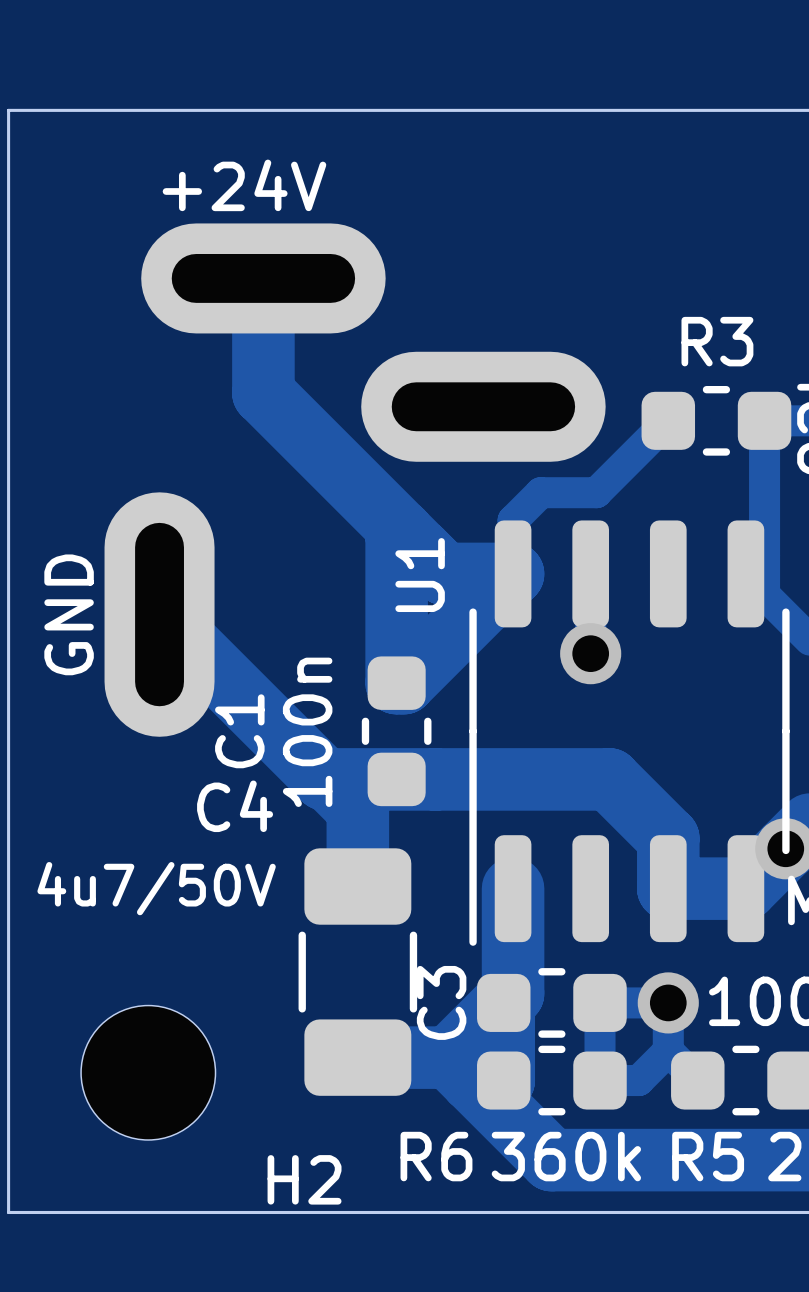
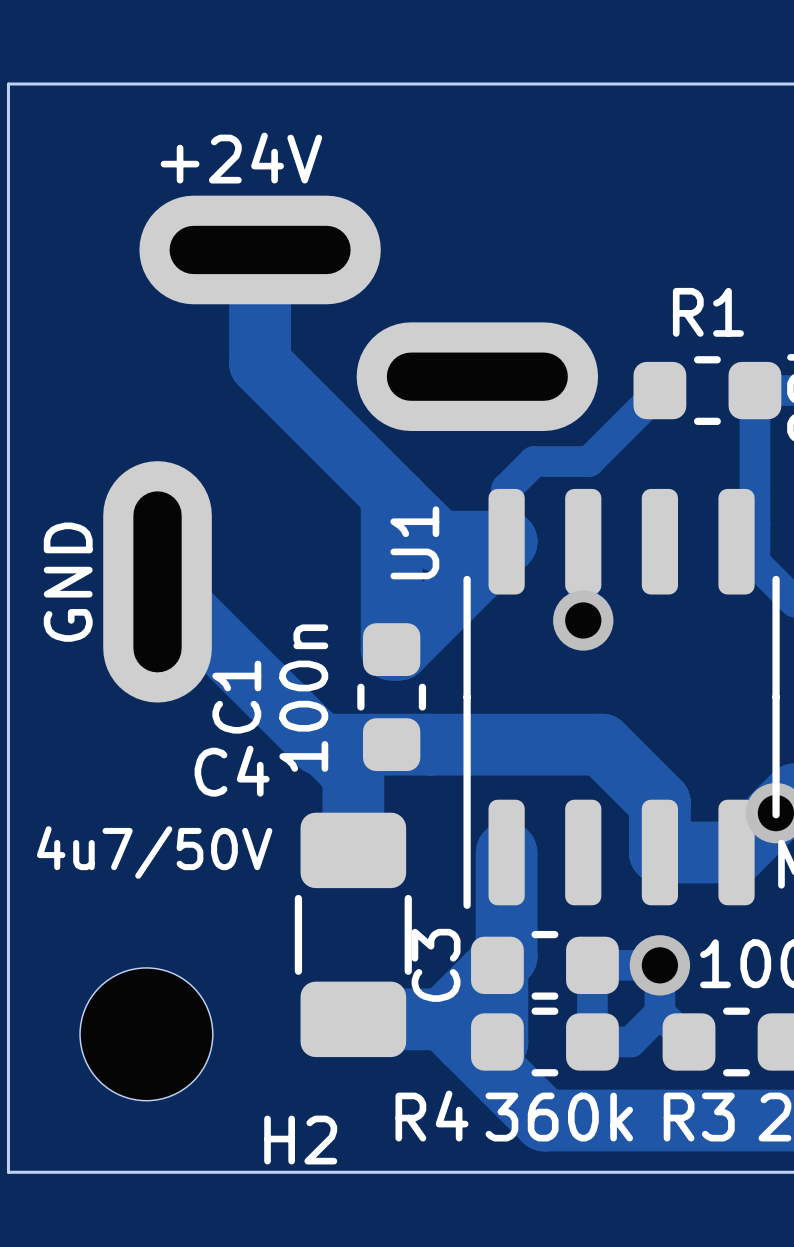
R3 name: R3 (717, 341) -> R1 (708, 312)
R6 name: R6 (436, 1156) -> R4 (431, 1116)
R5 name: R5 (708, 1156) -> R3 (699, 1117)

